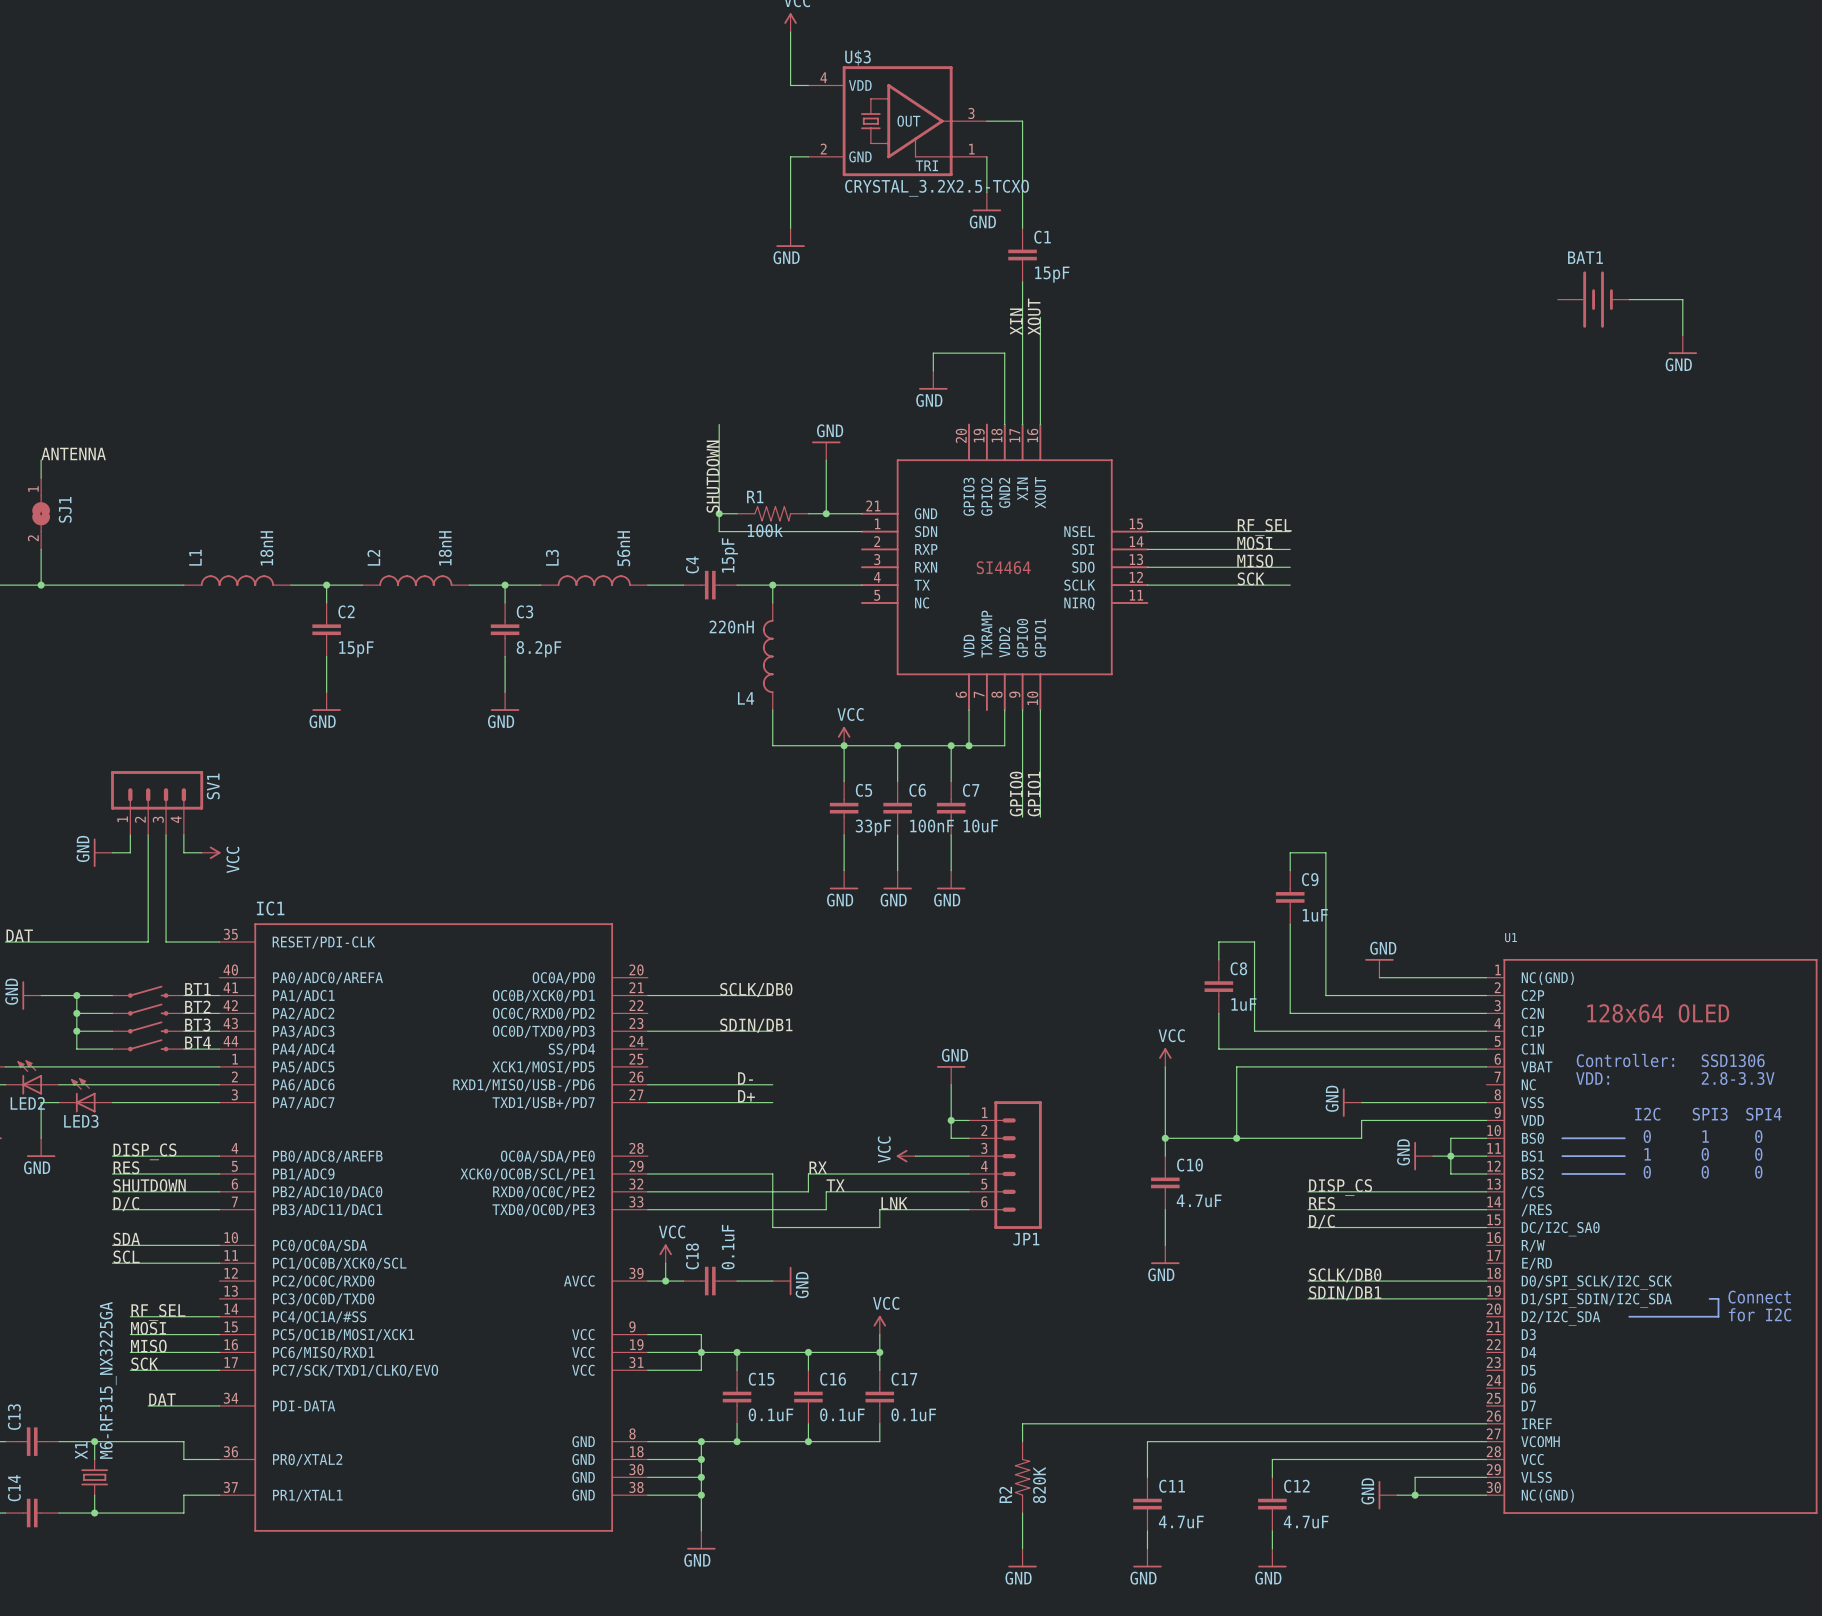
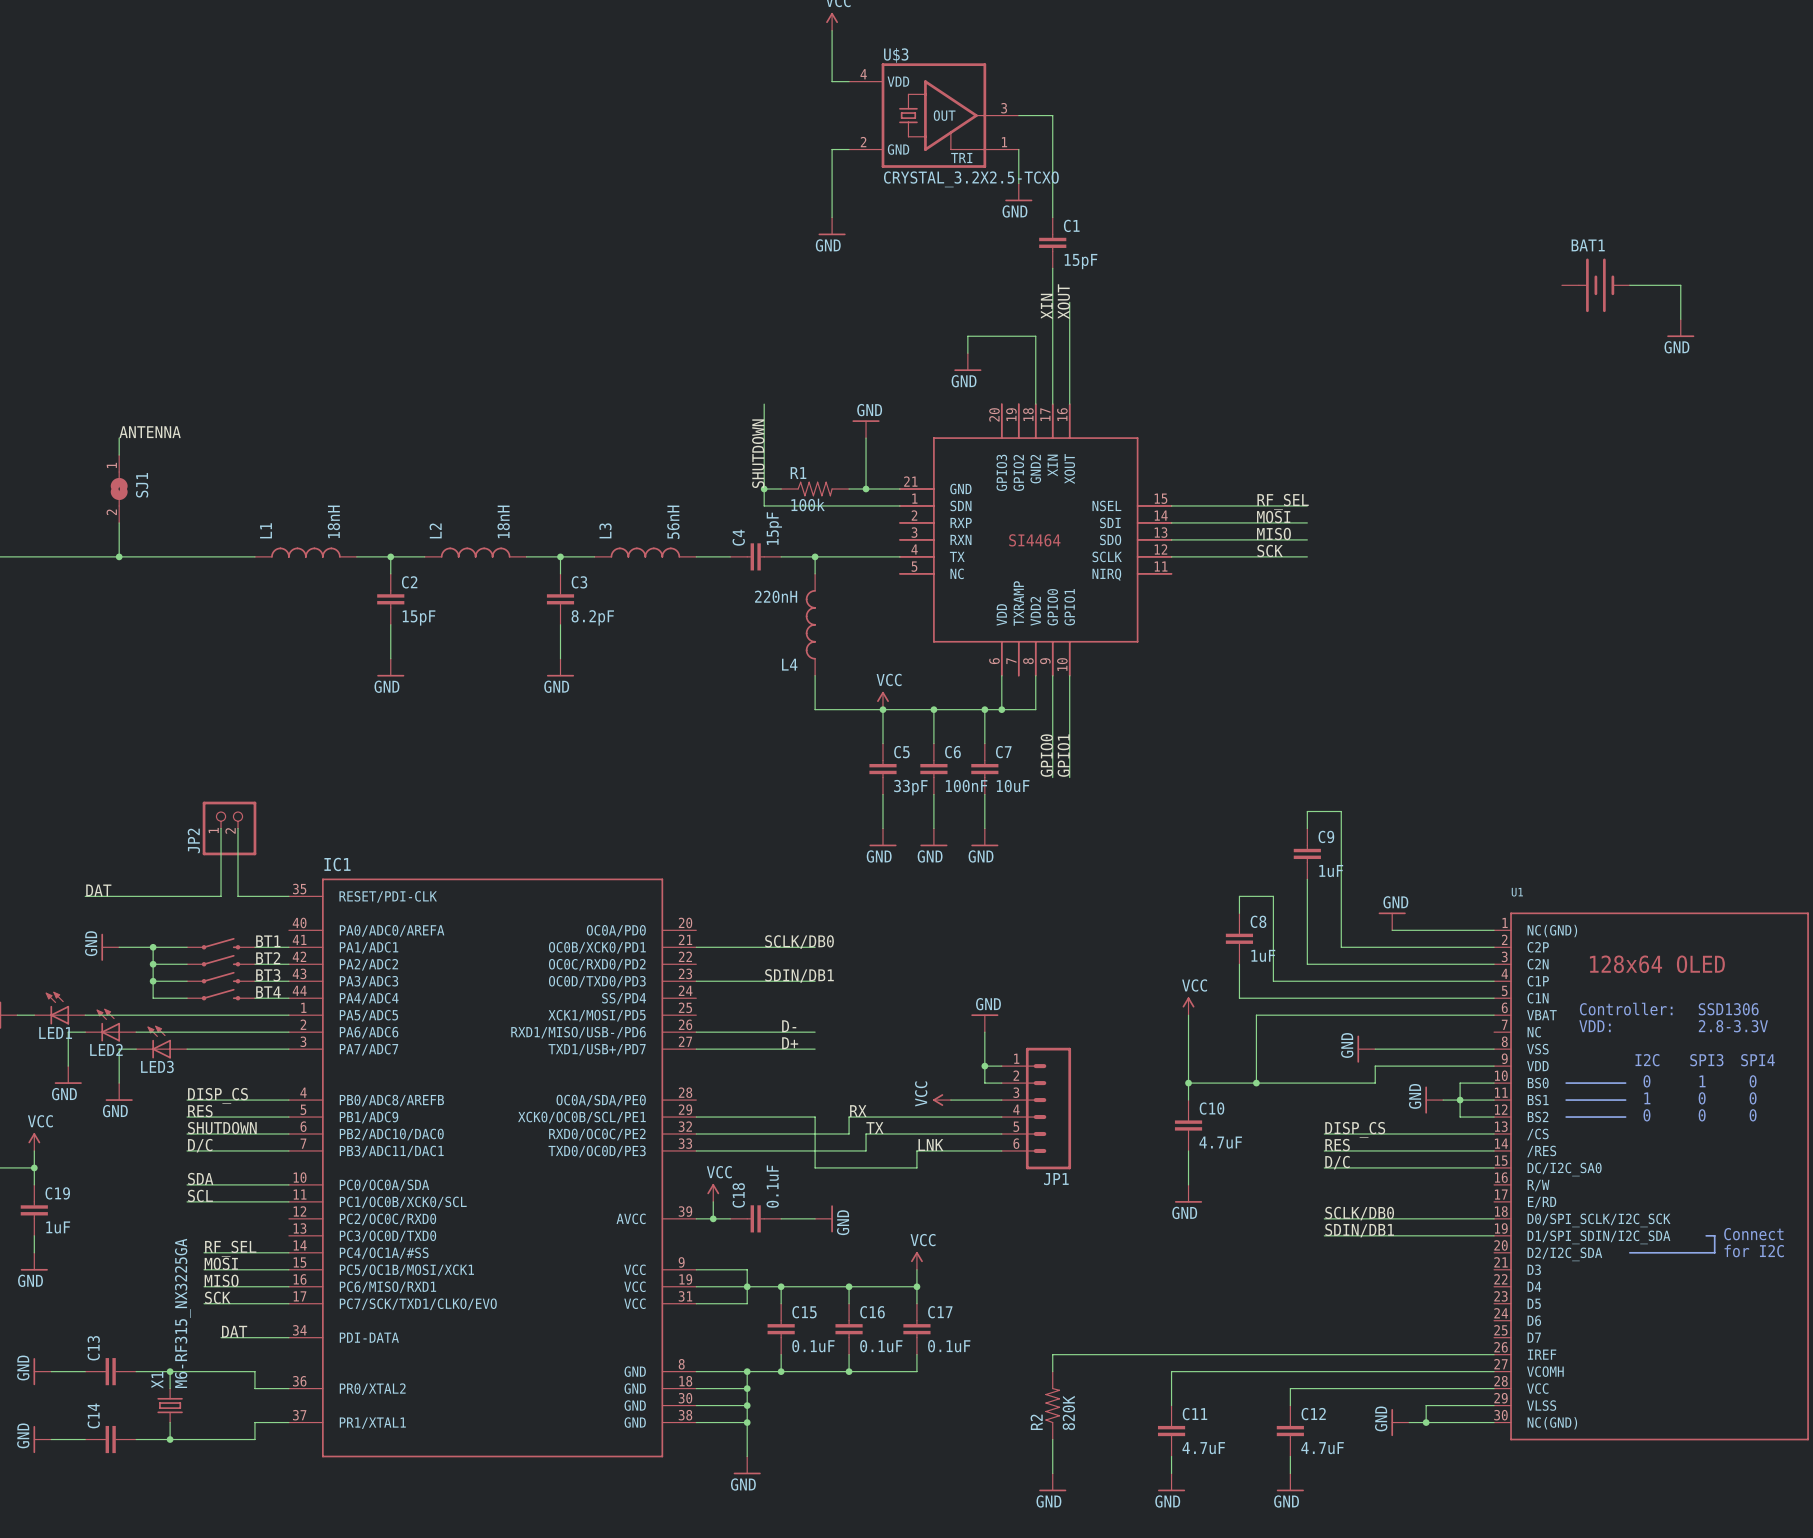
SV1: (157, 803) -> none
wire: (130, 834) (130, 852) (112, 852) -> none
wire: (148, 834) (148, 870) -> none
wire: (166, 834) (166, 870) -> none
wire: (183, 834) (183, 852) (201, 852) -> none
power symbol: GND (103, 852) -> none
power symbol: VCC (211, 852) -> none
JP2: none -> (229, 828)

